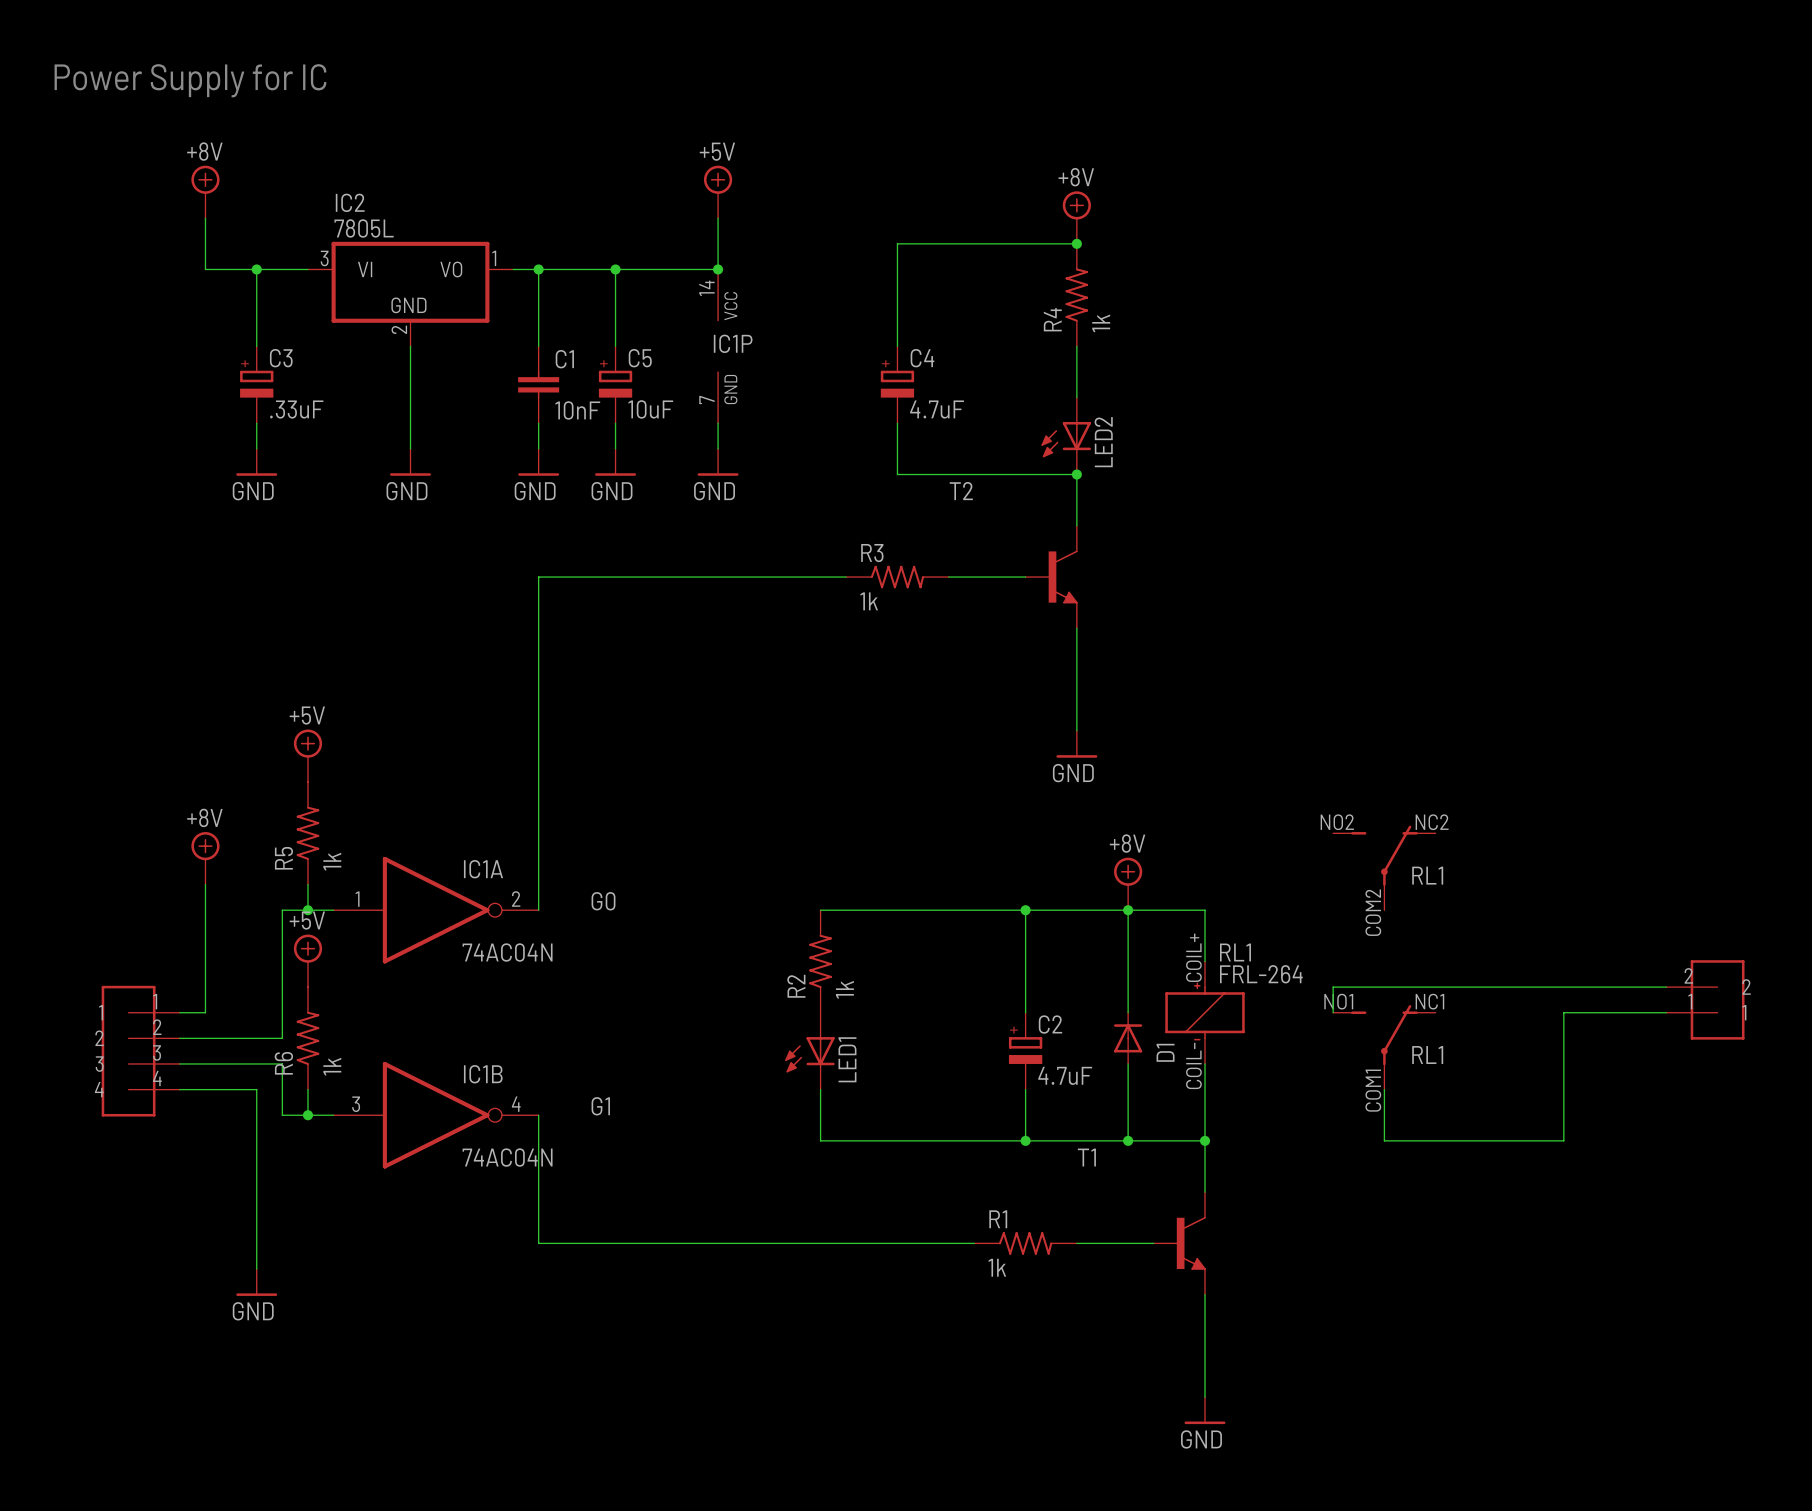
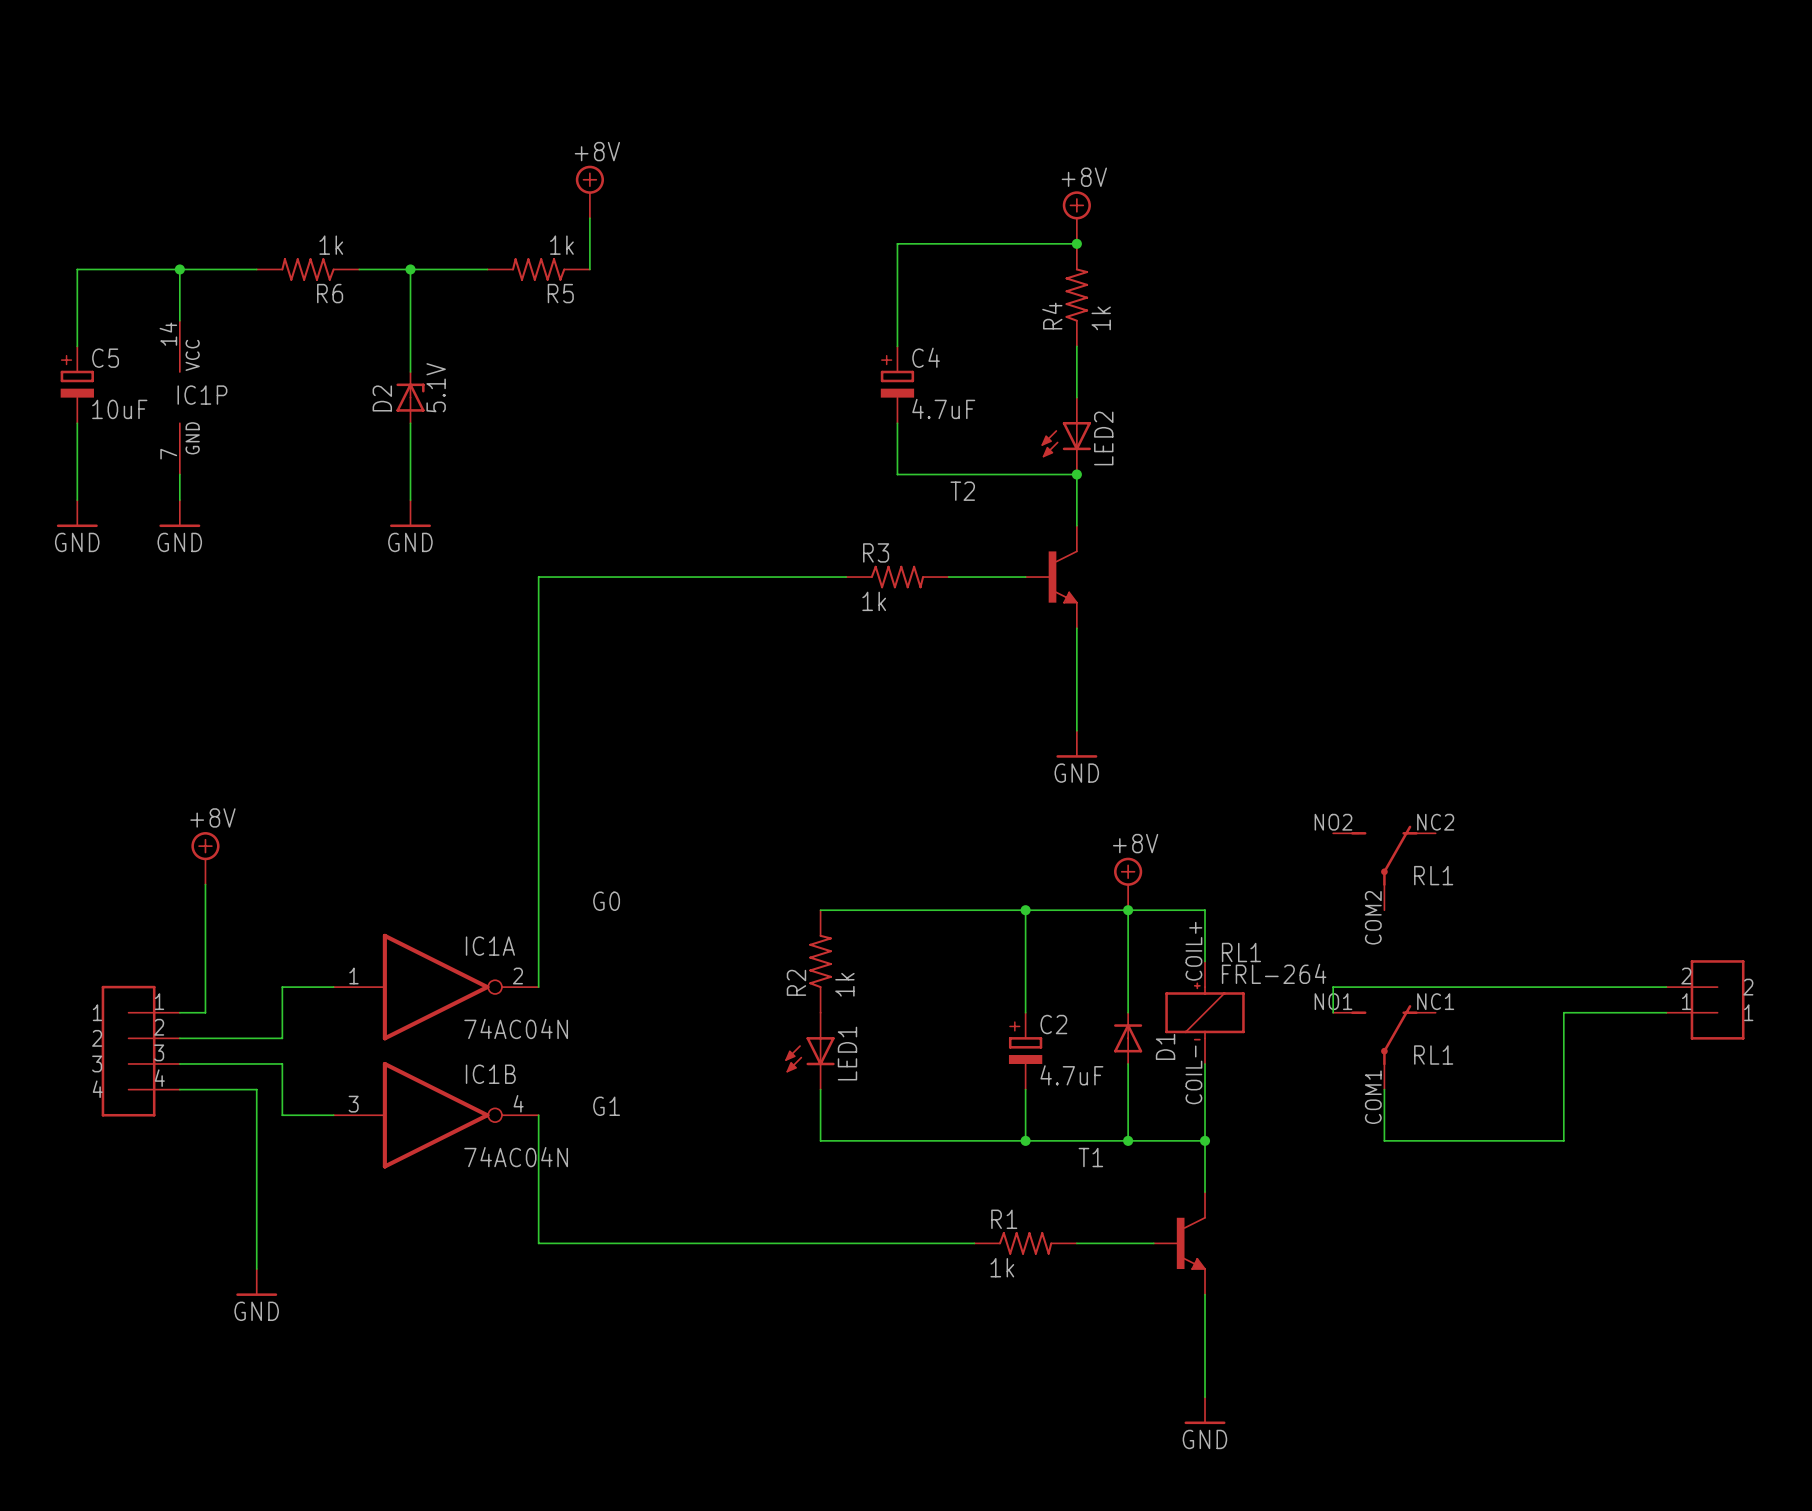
text: Power Supply for IC (190, 80) -> none
power symbol: +8V (205, 191) -> none
power symbol: none -> +8V (589, 191)
power symbol: +5V (718, 191) -> none
wire: (205, 218) (205, 269) -> (77, 346) (77, 269) (205, 269)
wire: none -> (589, 218) (589, 269)
wire: (718, 218) (718, 269) (513, 269) -> none
wire: none -> (179, 269) (179, 320)
junction: none -> (179, 269)
junction: (256, 269) -> none
wire: (307, 269) (256, 269) (256, 346) -> none
wire: none -> (359, 269) (487, 269)
junction: none -> (410, 269)
wire: (538, 269) (538, 346) -> (410, 269) (410, 346)
junction: (538, 269) -> none
wire: (615, 269) (615, 346) -> none
junction: (615, 269) -> none
junction: (718, 269) -> none
IC2: 7805L (410, 294) -> none
IC1P position: (718, 346) -> (179, 397)
C3: .33uF (256, 384) -> none
C1: 10nF (538, 384) -> none
C5 position: (615, 384) -> (77, 384)
D2: none -> 5.1V (410, 397)
wire: none -> (77, 423) (77, 500)
wire: (256, 423) (256, 448) -> (179, 474) (179, 500)
wire: (538, 423) (538, 448) -> none
wire: (615, 423) (615, 448) -> none
wire: (718, 423) (718, 448) -> none
power symbol: GND (256, 462) -> none
power symbol position: GND (410, 462) -> GND (410, 513)
power symbol: GND (538, 462) -> none
power symbol: GND (615, 462) -> none
power symbol: GND (718, 462) -> none
power symbol: none -> GND (77, 513)
power symbol: none -> GND (179, 513)
power symbol: +5V (307, 755) -> none
R5 rotation: 0° (307, 833) -> 90° counterclockwise (538, 269)
R5 position: (307, 833) -> (538, 269)
wire: (307, 884) (307, 910) -> none
junction: (307, 910) -> none
wire: (333, 910) (282, 910) (282, 987) -> (333, 987) (282, 987)
IC1A position: (436, 910) -> (436, 987)
wire: none -> (538, 910) (538, 987)
power symbol: +5V (307, 960) -> none
R6 rotation: 0° (307, 1038) -> 90° counterclockwise (307, 269)
R6 position: (307, 1038) -> (307, 269)
wire: (307, 1089) (307, 1115) -> none
junction: (307, 1115) -> none

